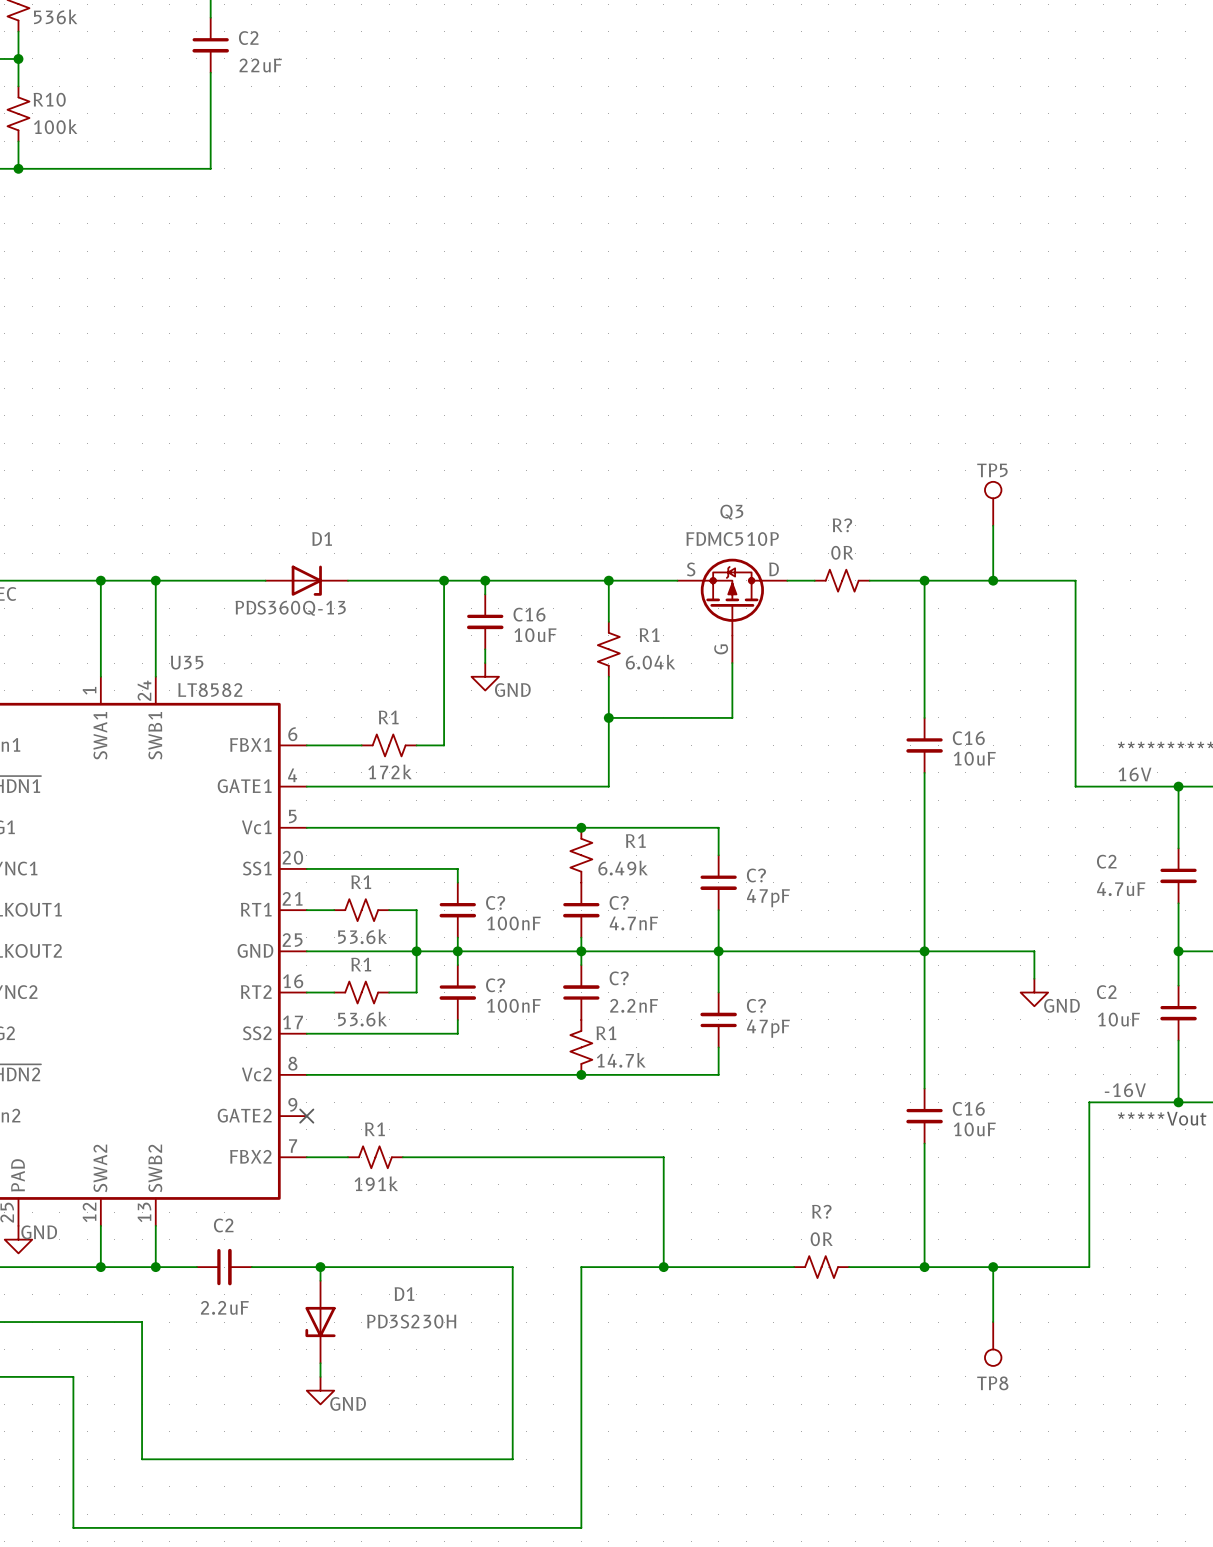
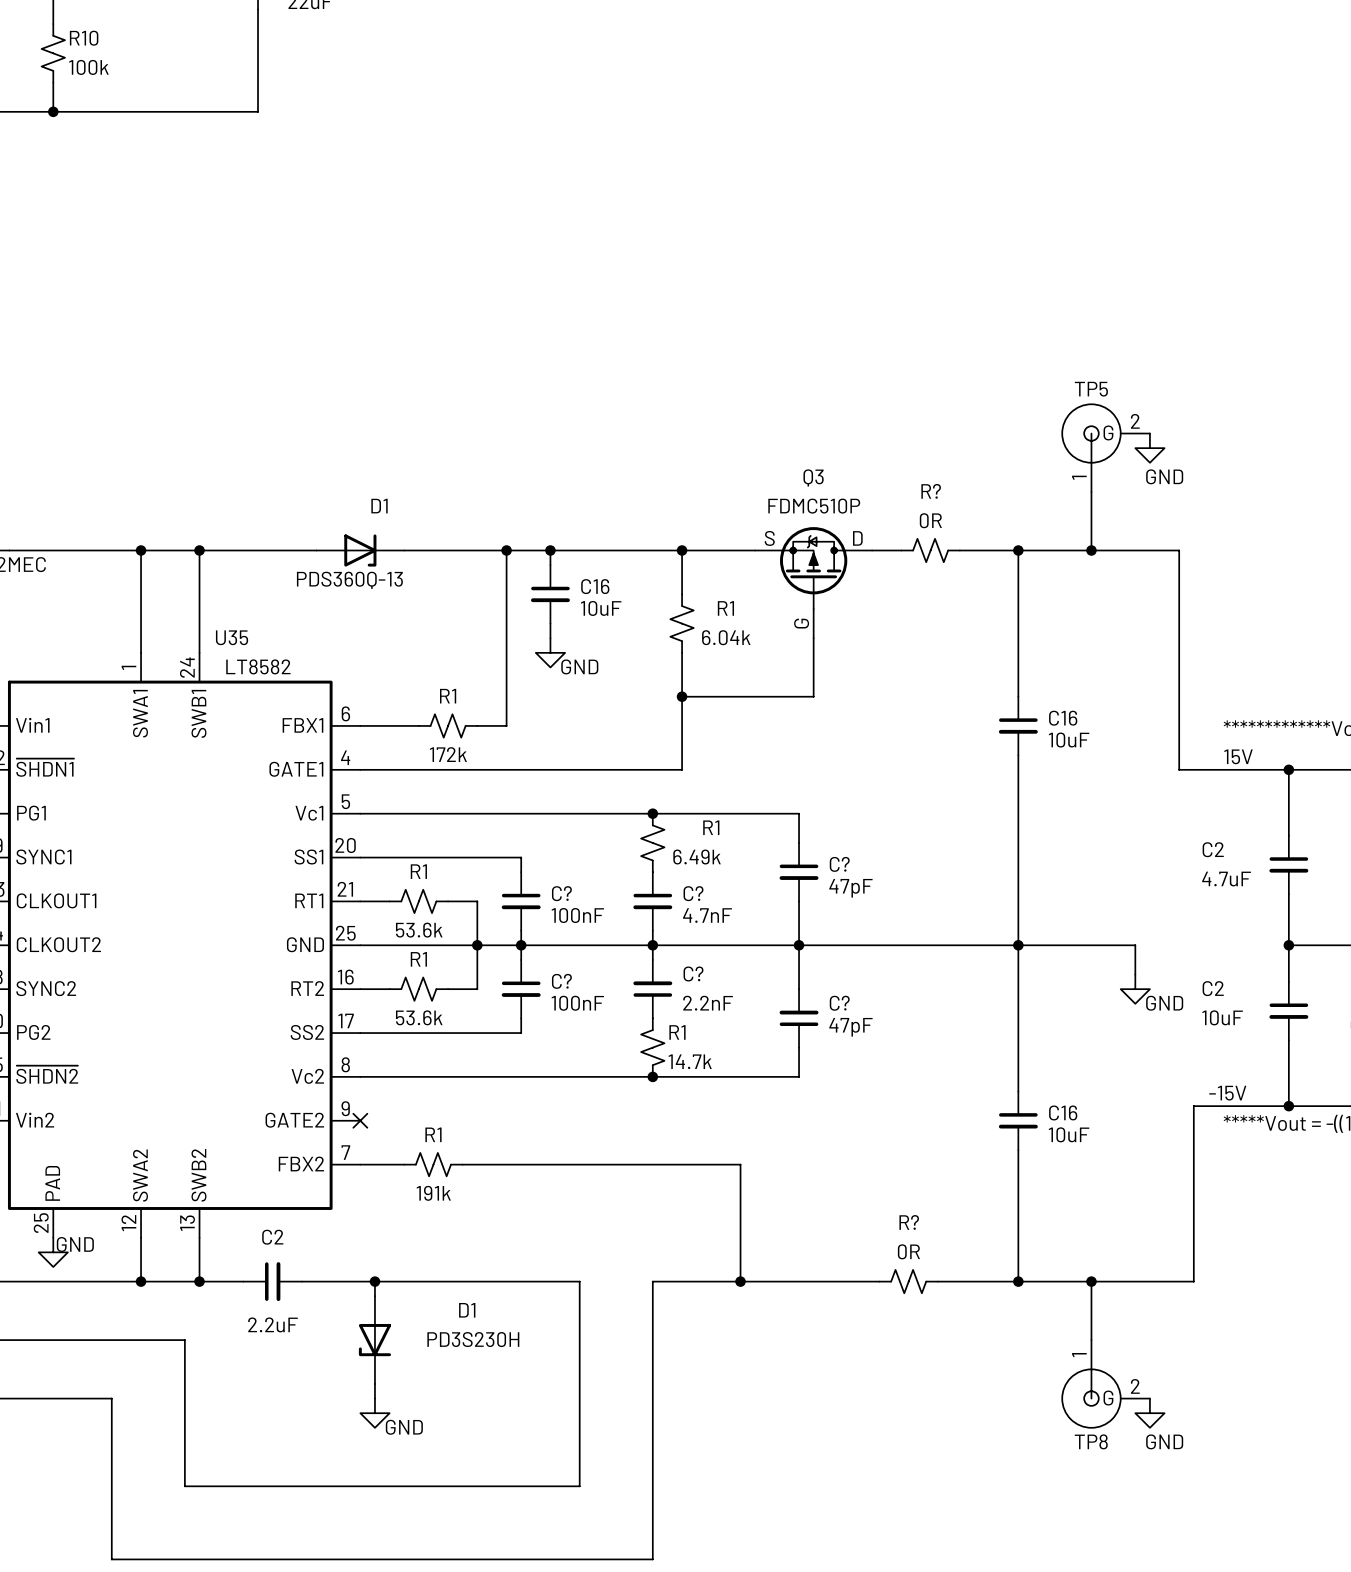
TP5 name position: TP5 (992, 470) -> TP5 (1091, 389)
TP5 symbol: [984, 481, 1002, 526] -> [1062, 404, 1150, 493]
power symbol: none -> GND (1149, 448)
label: 16V (1134, 774) -> 15V (1238, 756)
label: -16V (1125, 1090) -> -15V (1227, 1093)
TP8 symbol: [984, 1322, 1002, 1366] -> [1062, 1340, 1150, 1428]
power symbol: none -> GND (1149, 1413)

